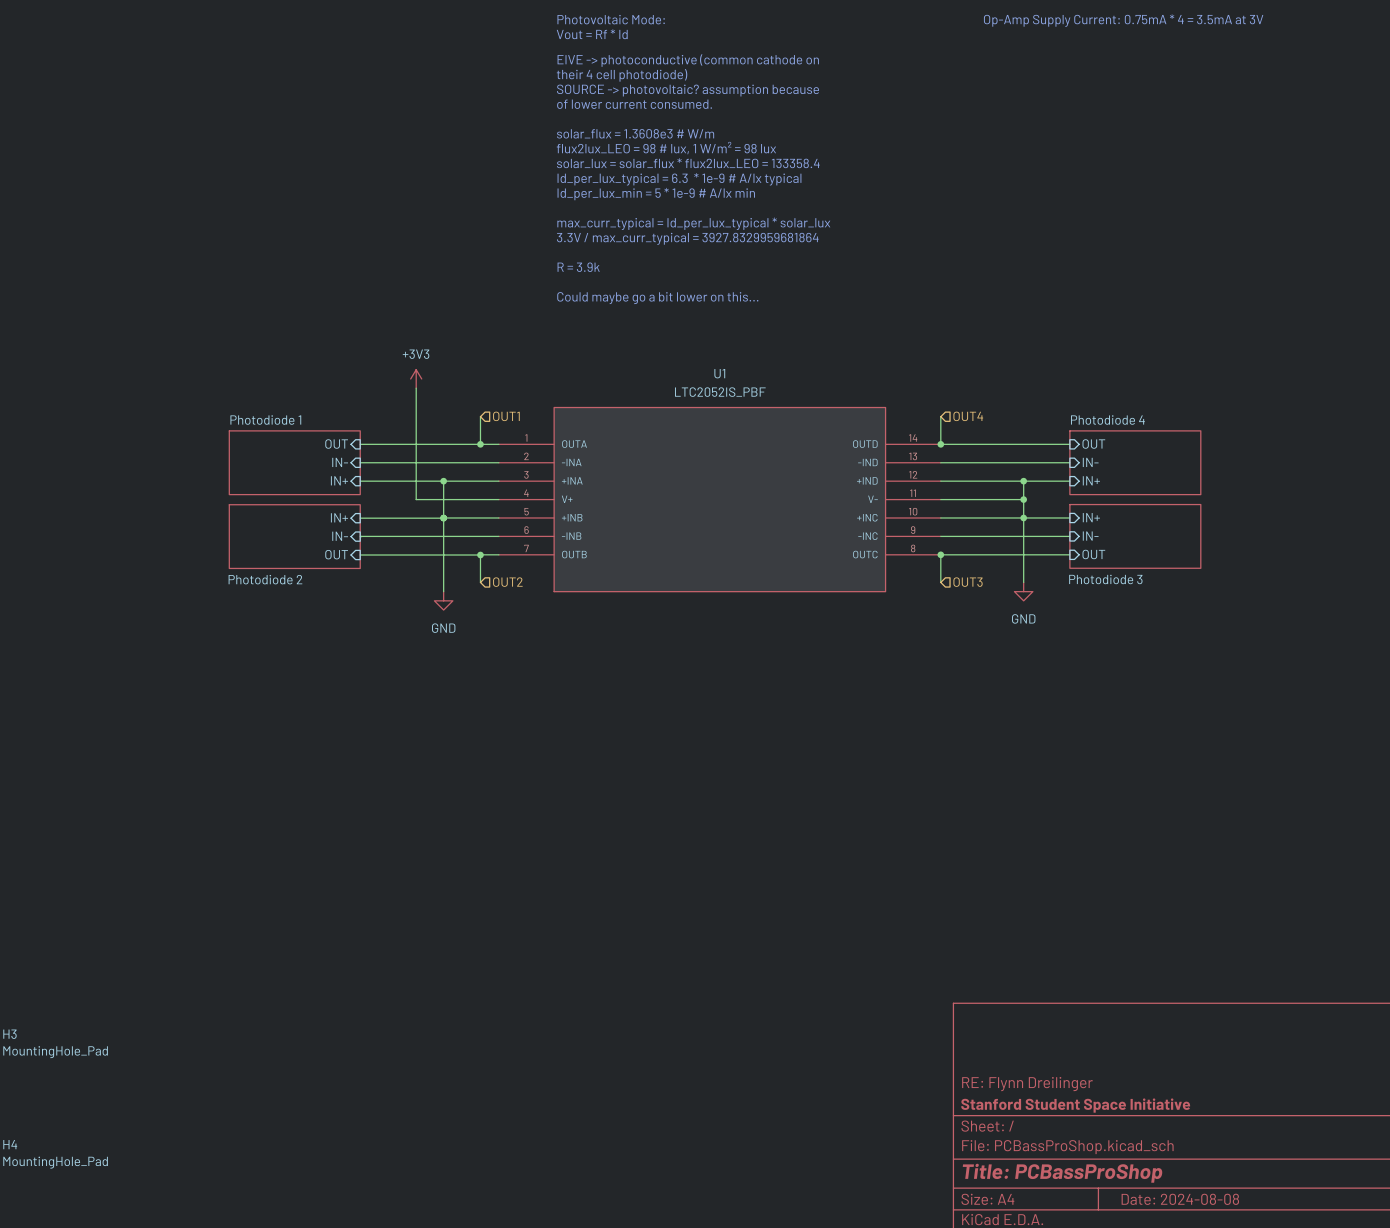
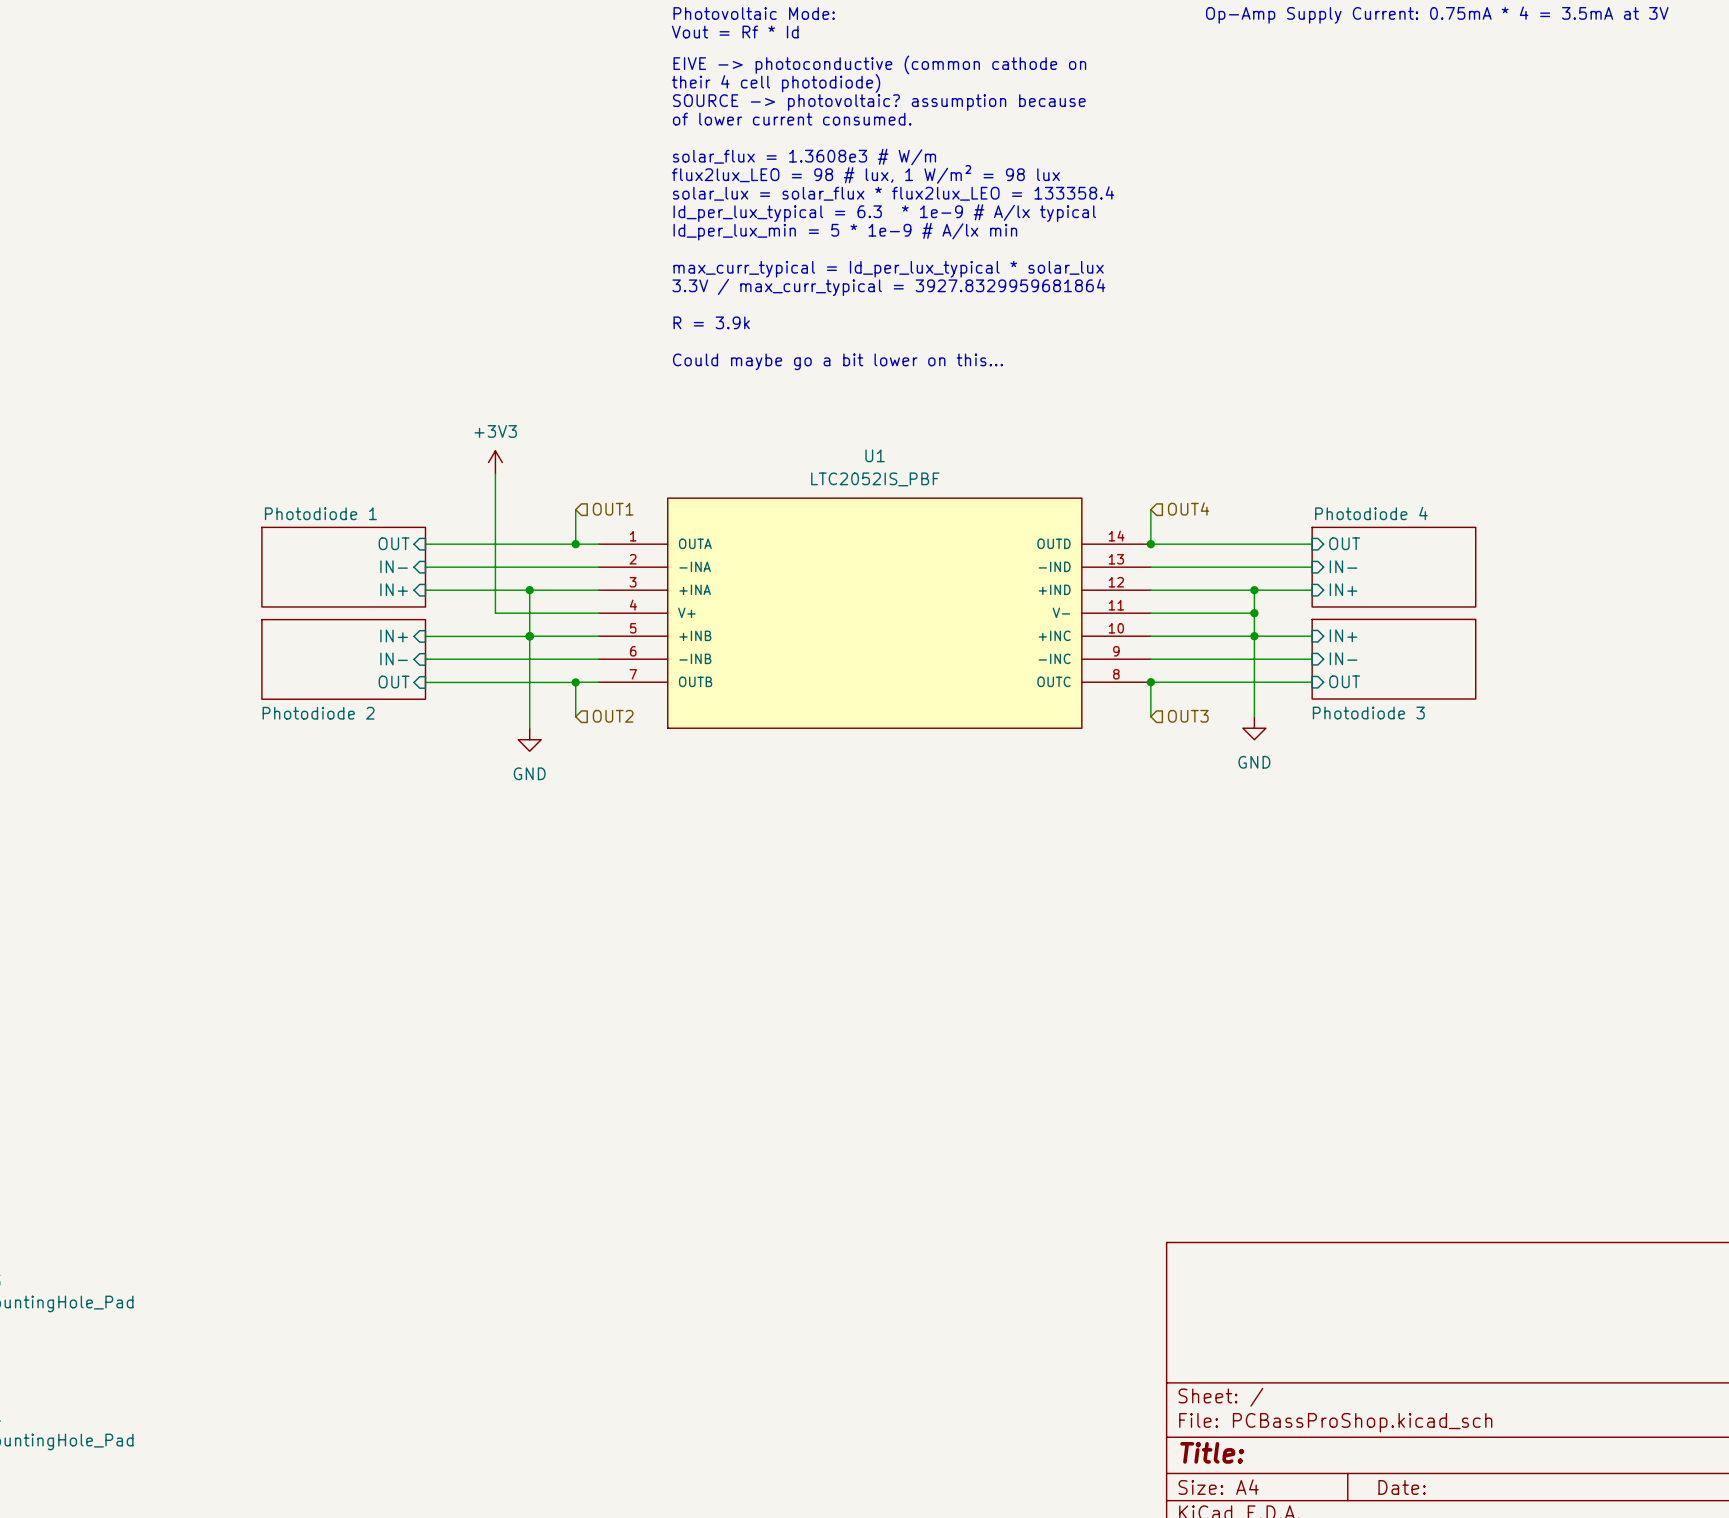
title block: RE: Flynn Dreilinger (1027, 1084) -> none
title block: Stanford Student Space Initiative (1075, 1105) -> none
title block: Title: PCBassProShop (1062, 1173) -> Title: (1212, 1452)
title block: Date: 2024-08-08 (1180, 1199) -> Date: (1402, 1487)

